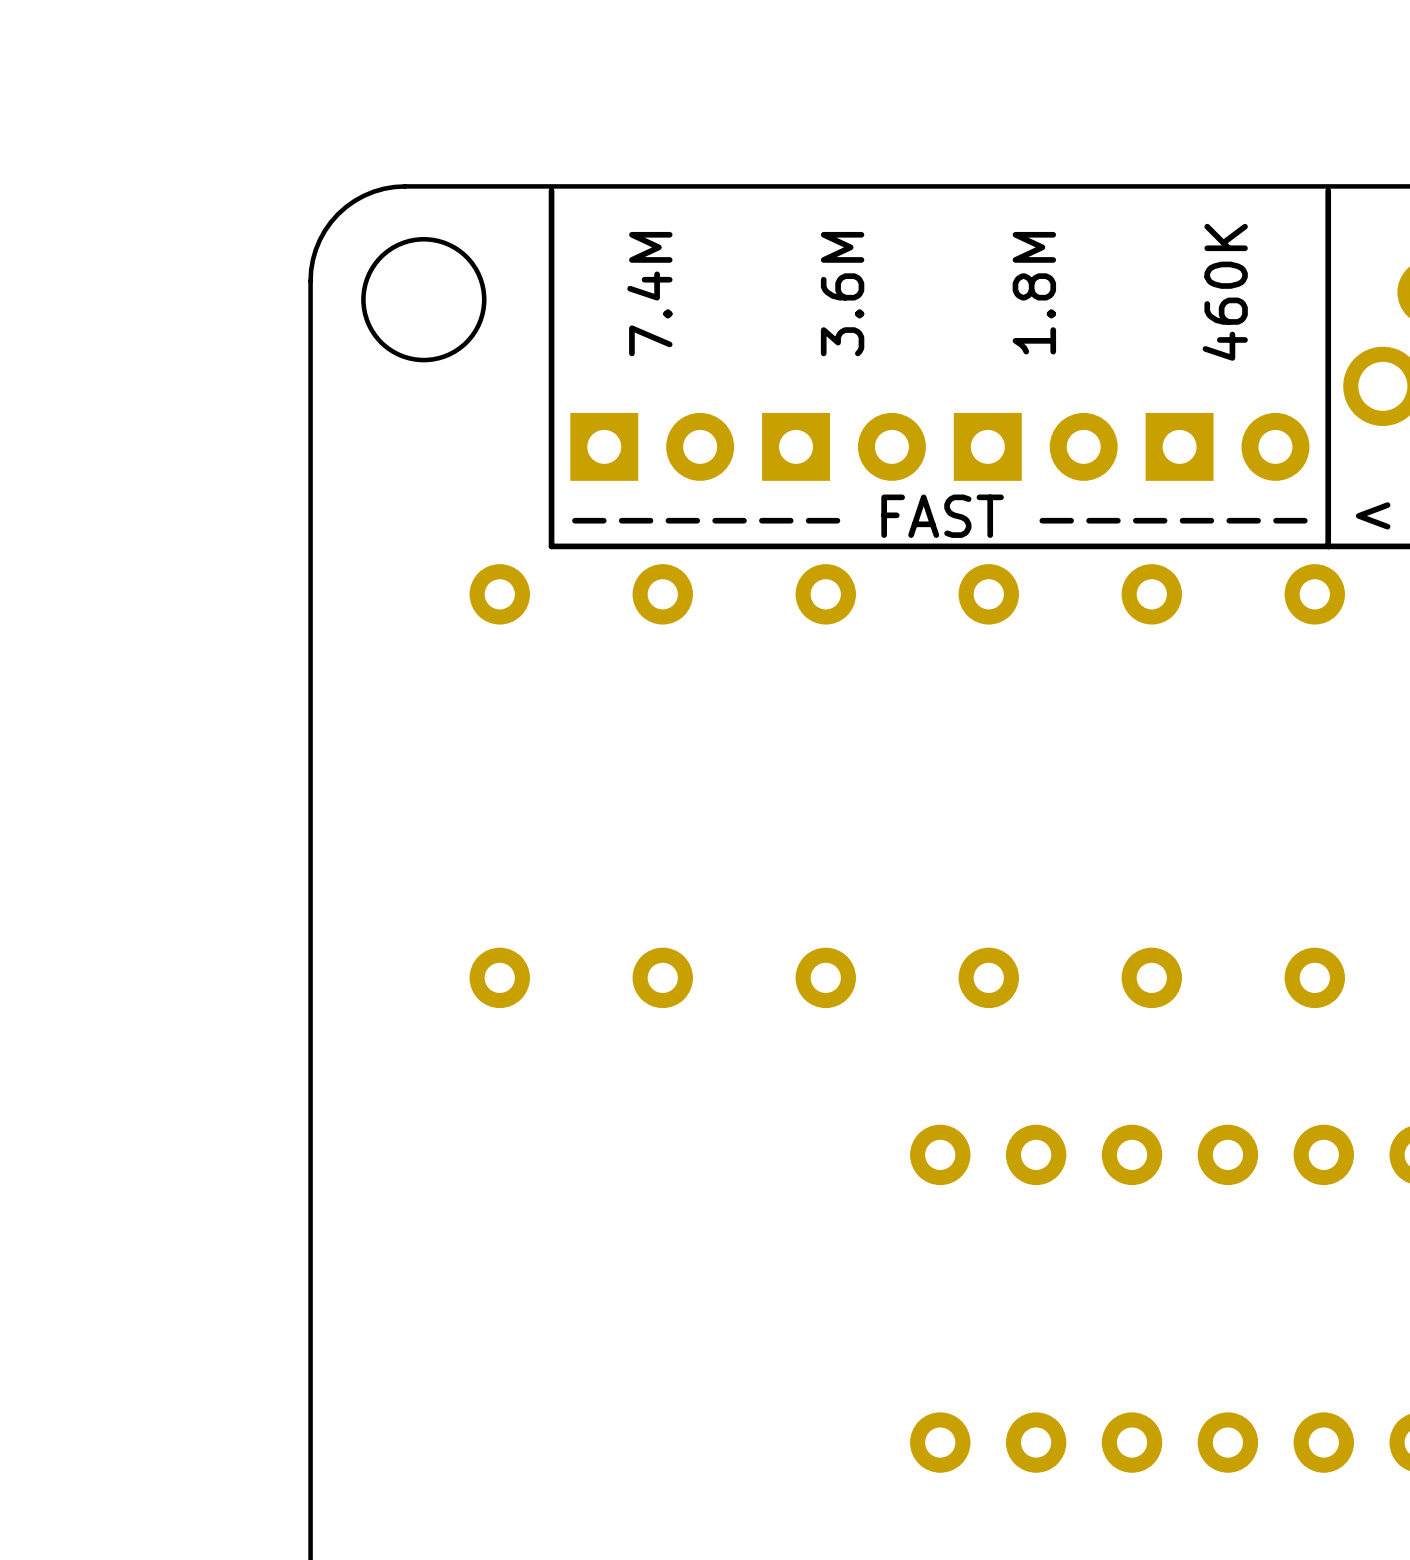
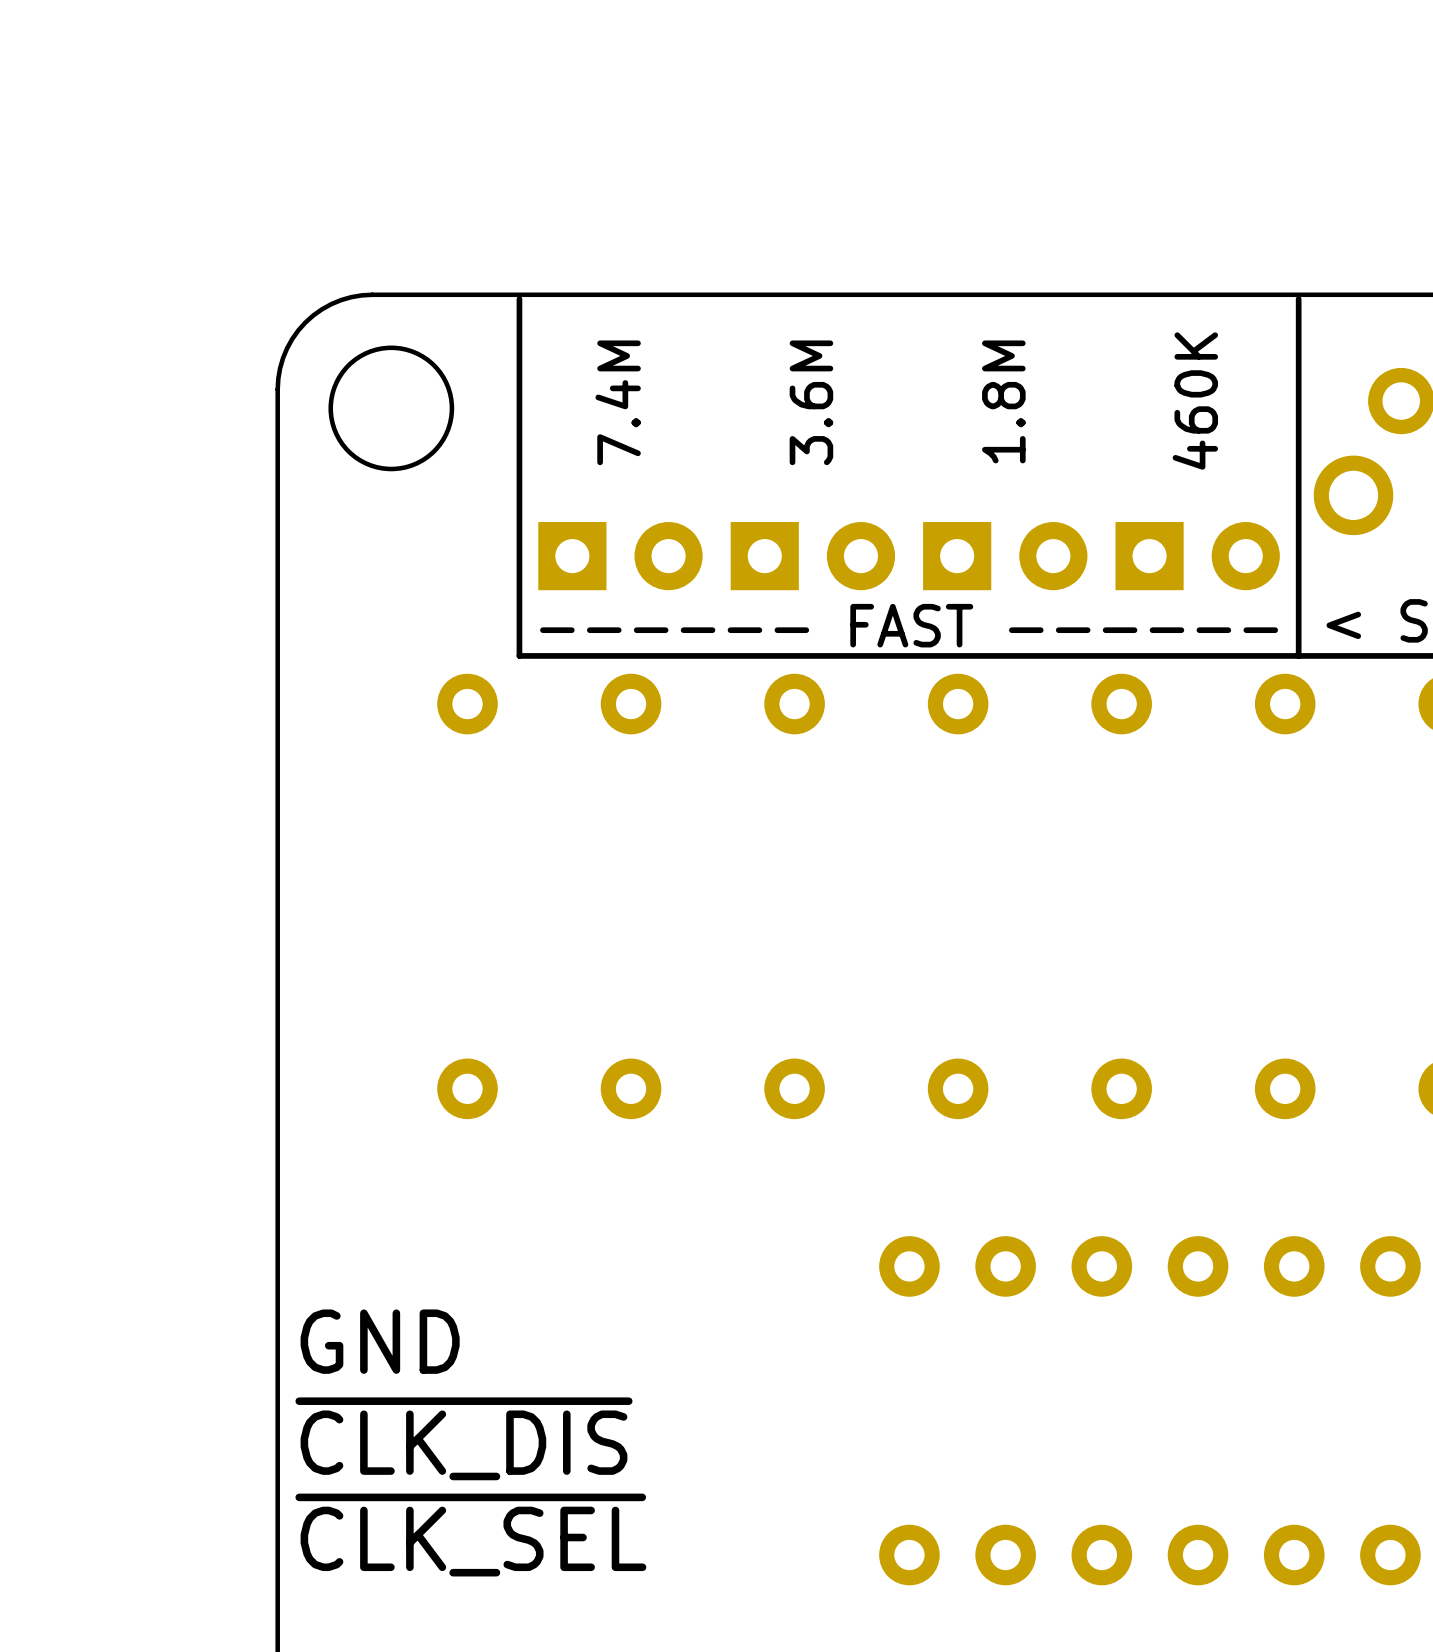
text: none -> GND (380, 1341)
text: none -> ~{CLK_DIS} (463, 1438)
text: none -> ~{CLK_SEL} (470, 1535)

